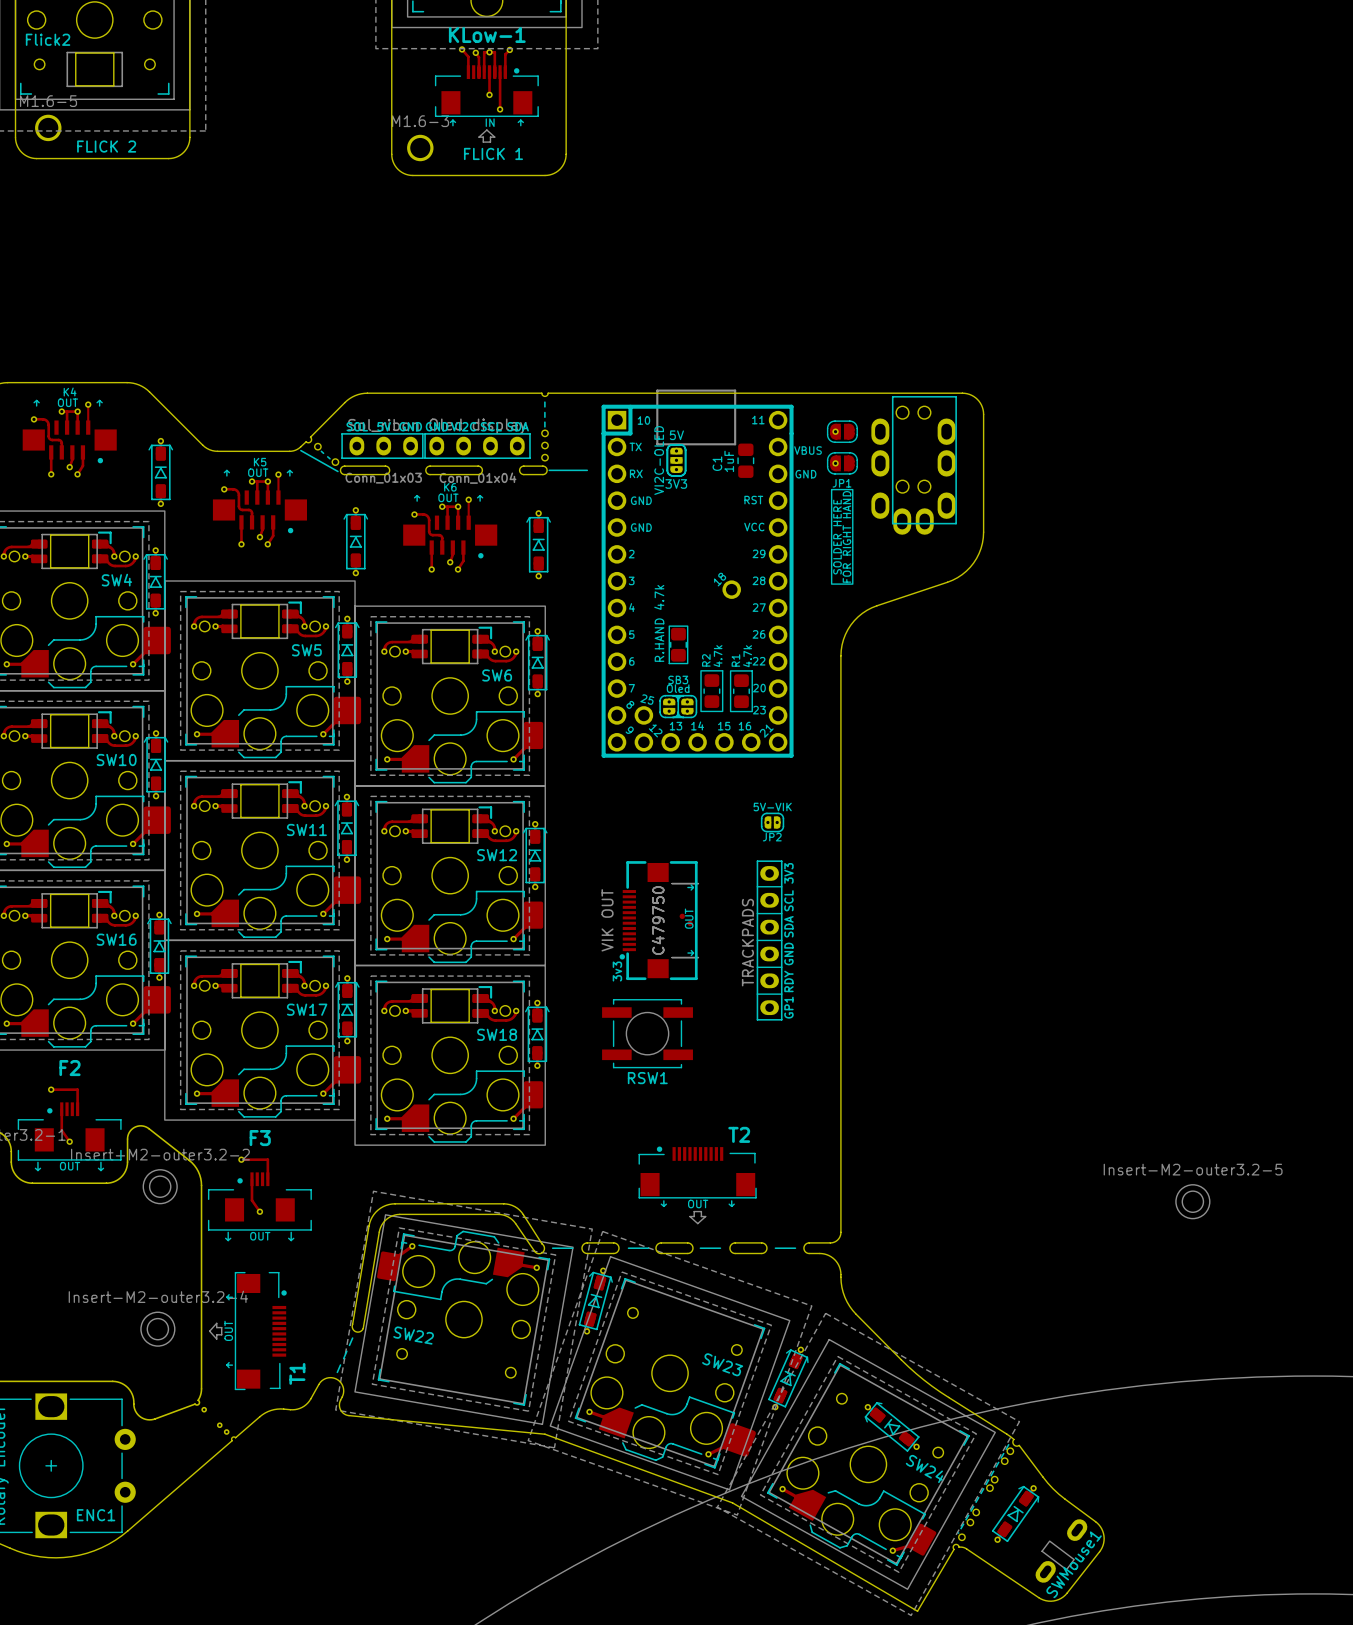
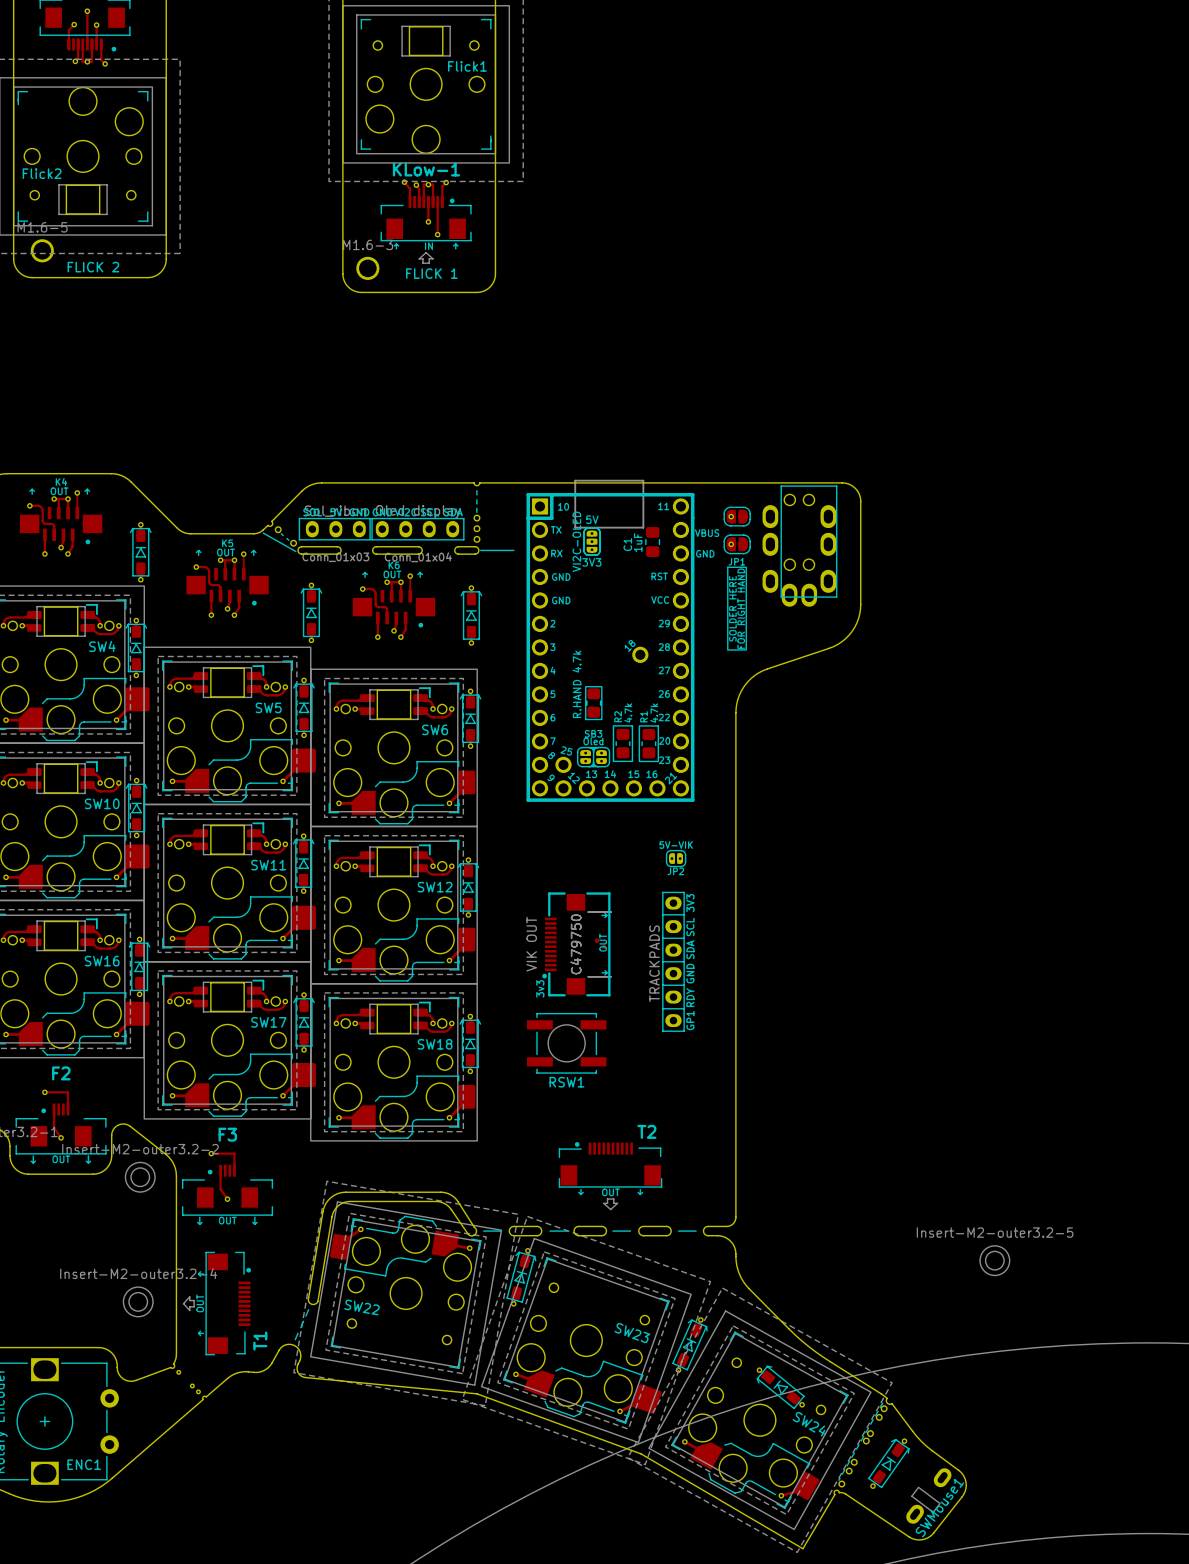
Insert-M2-outer3.2-5 position: (1192, 1201) -> (994, 1260)

